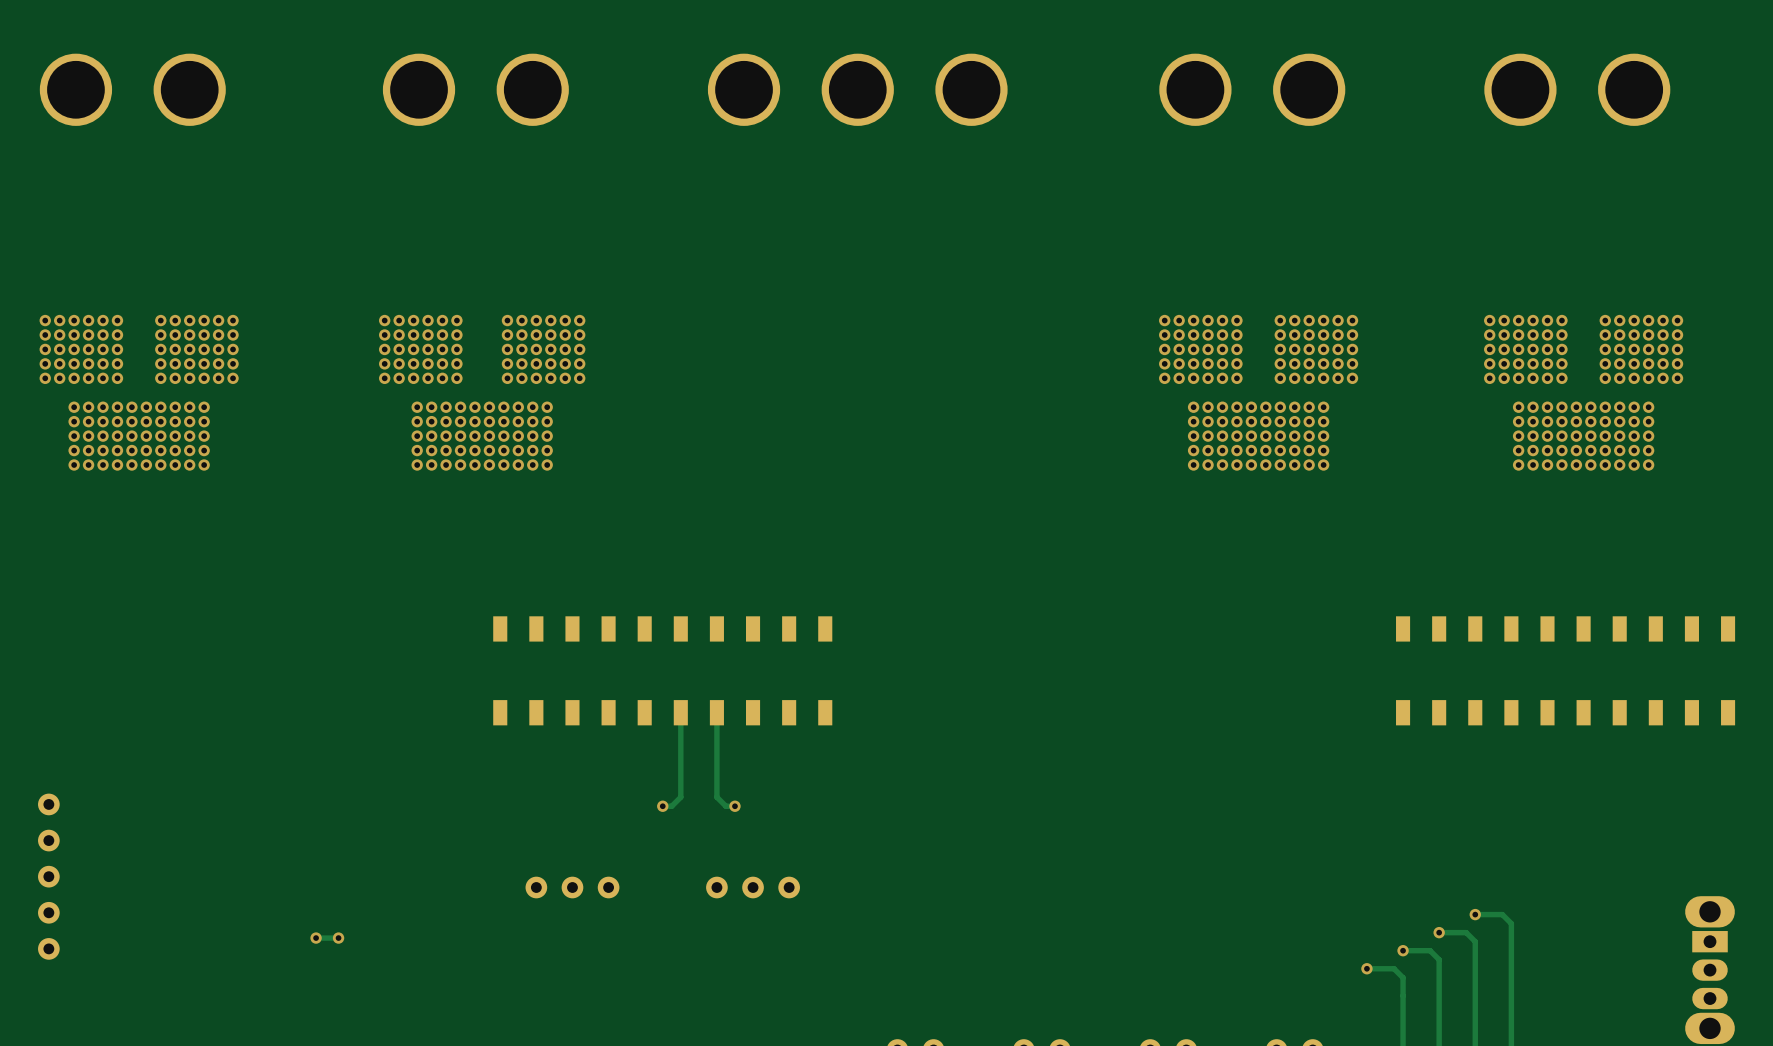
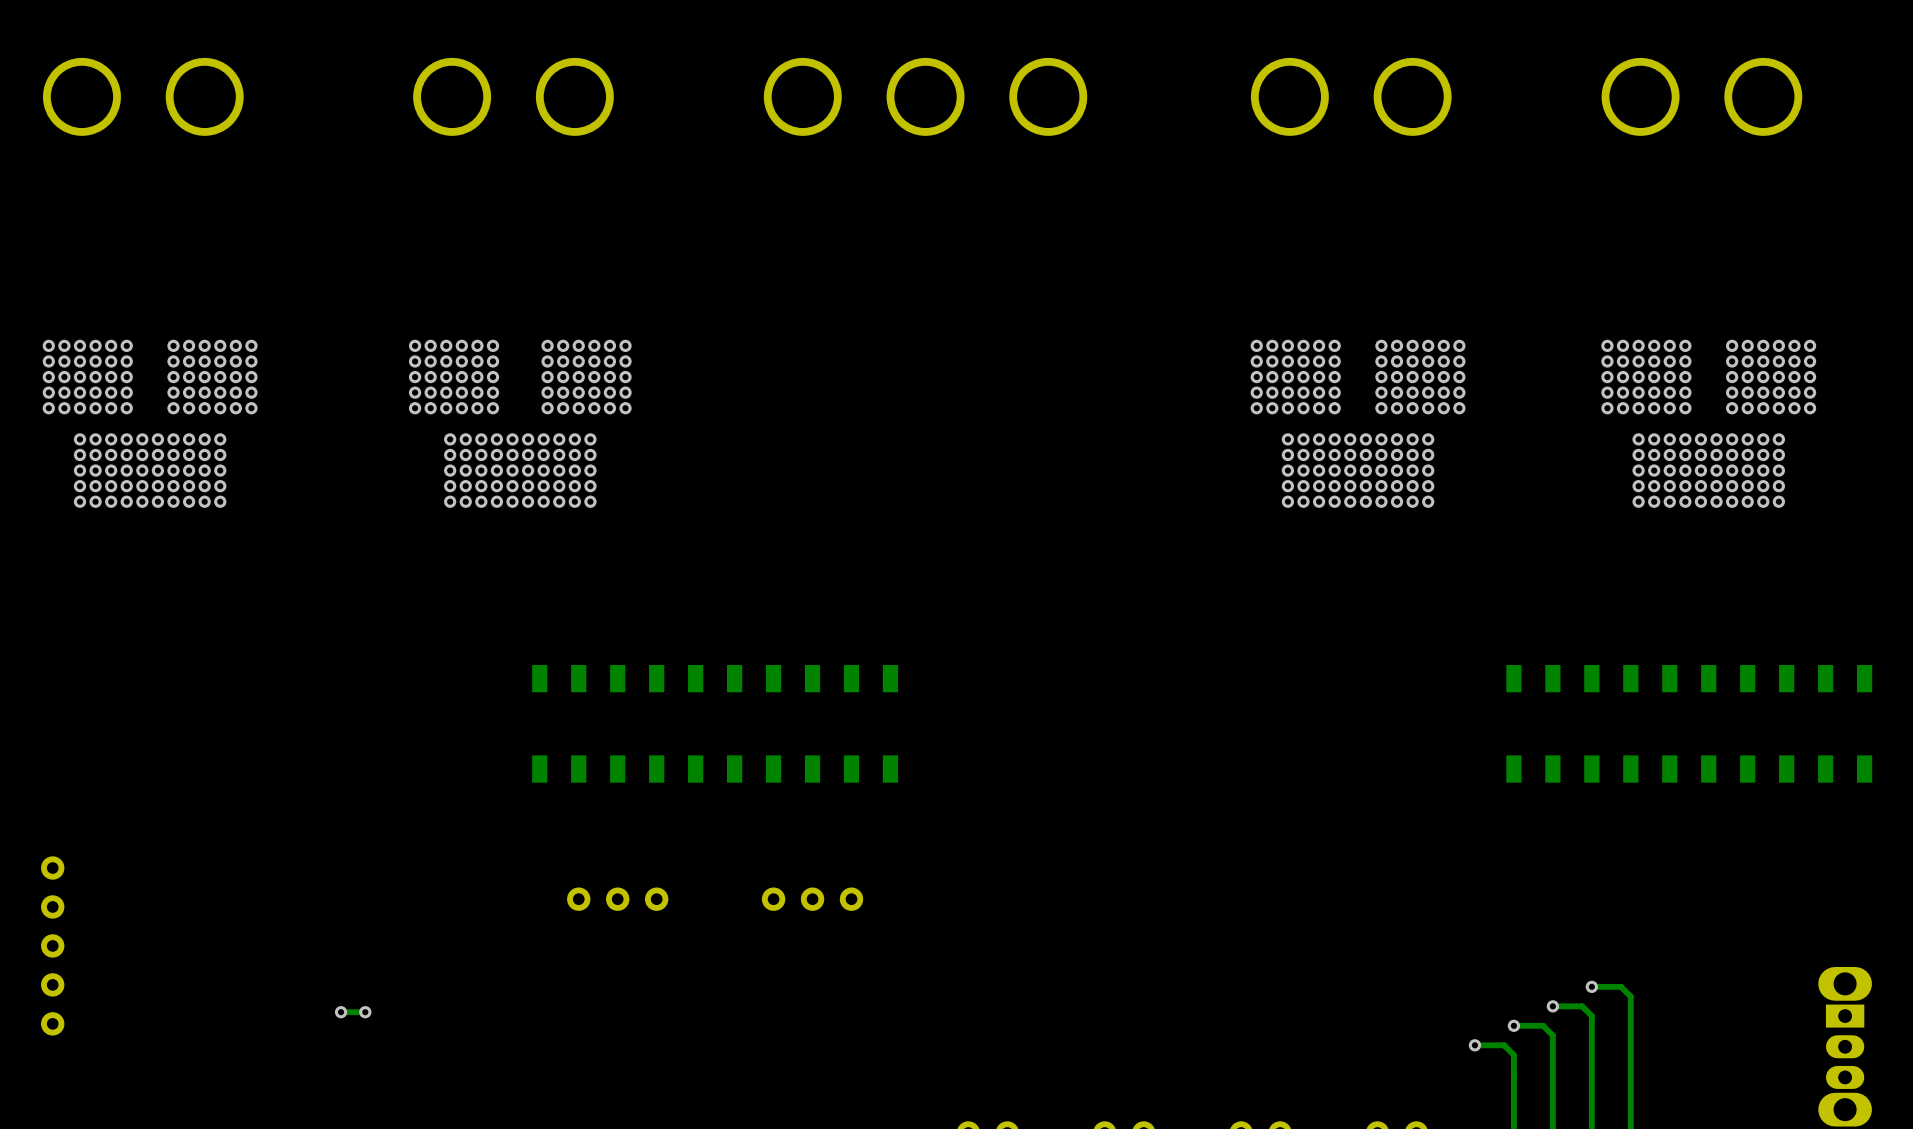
track: (680, 712) (680, 797) (671, 806) (662, 806) -> none
track: (716, 712) (716, 797) (725, 806) (734, 806) -> none
via: (662, 806) -> none
via: (734, 806) -> none
part position: (572, 887) -> (617, 899)
part position: (753, 887) -> (812, 899)

